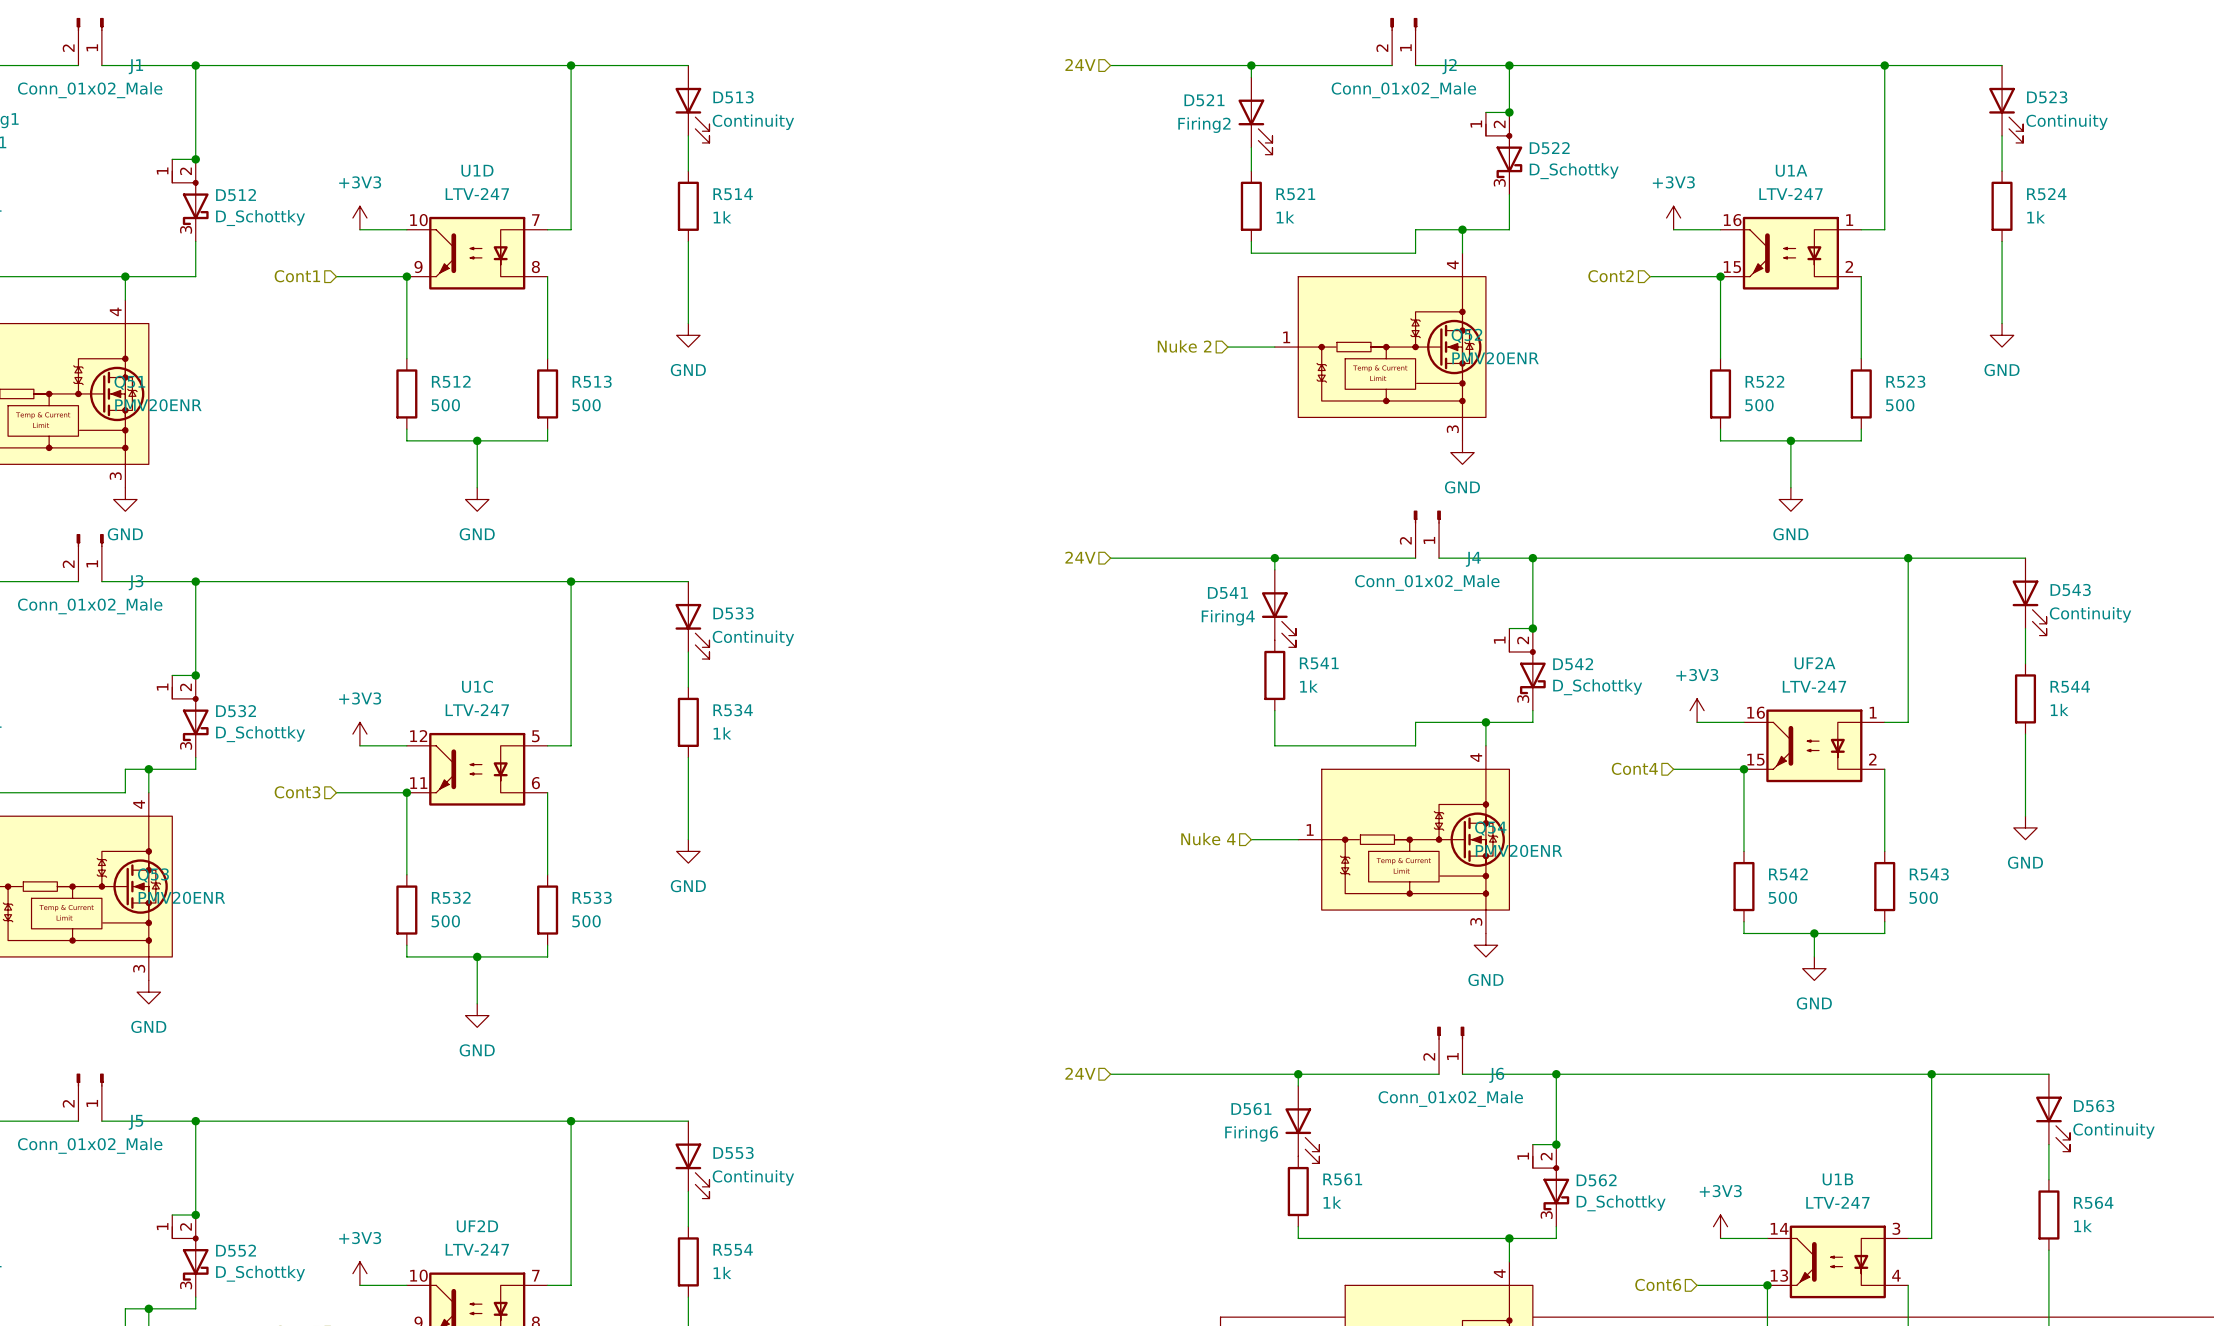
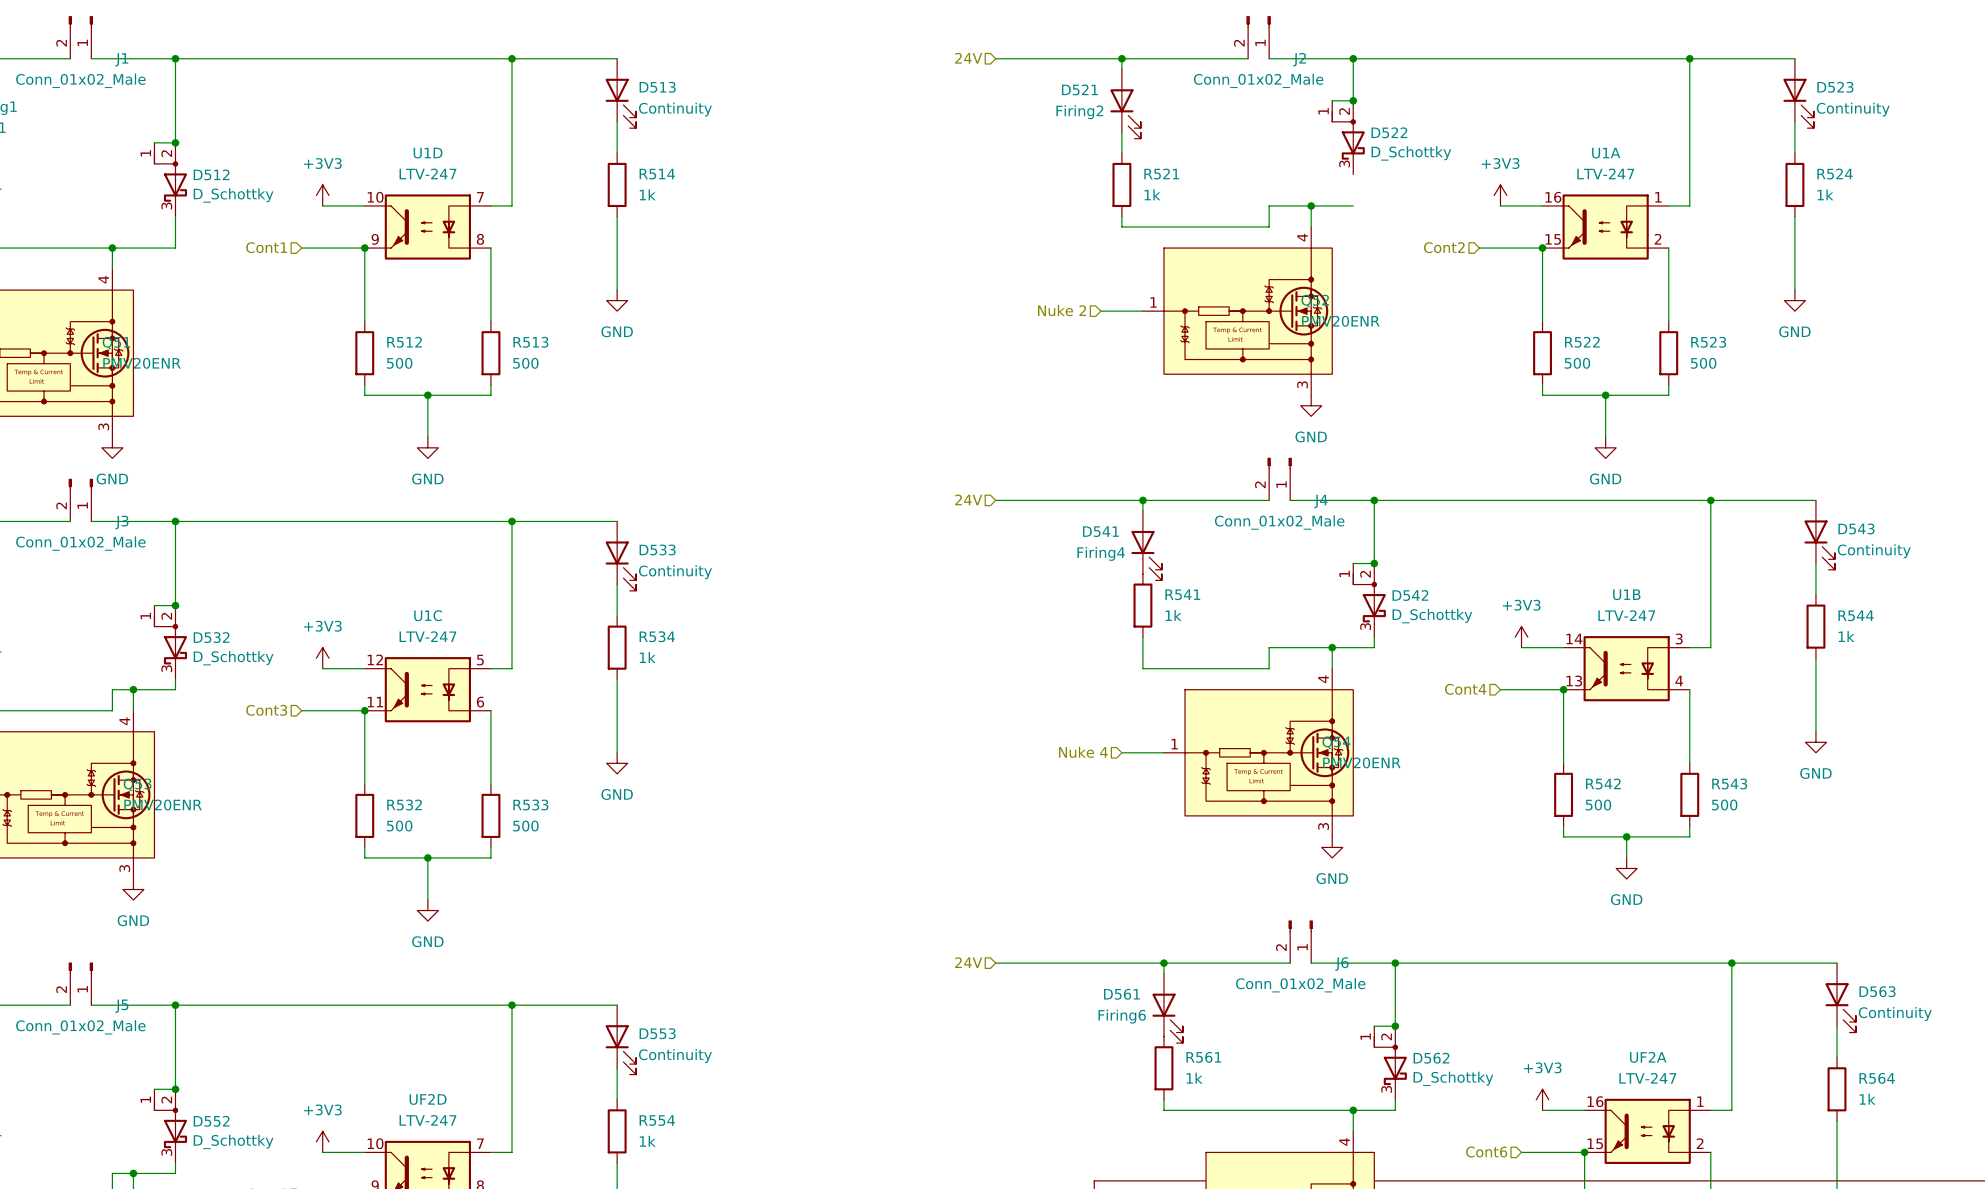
wire: (1509, 194) (1509, 229) -> none
UF2A position: (1814, 745) -> (1647, 1131)
U1B position: (1837, 1261) -> (1626, 668)

